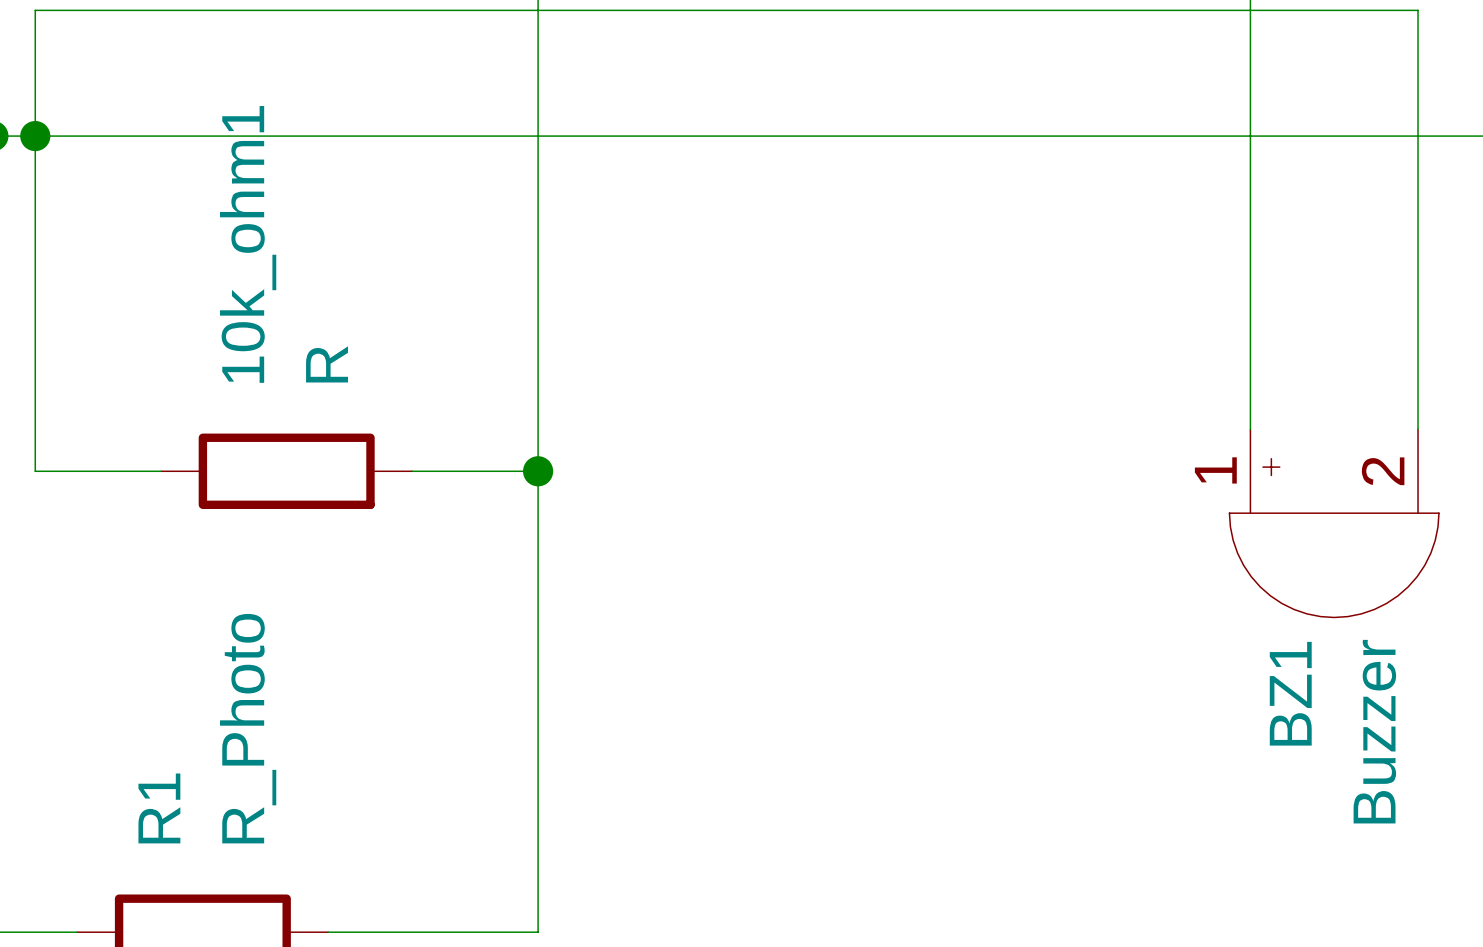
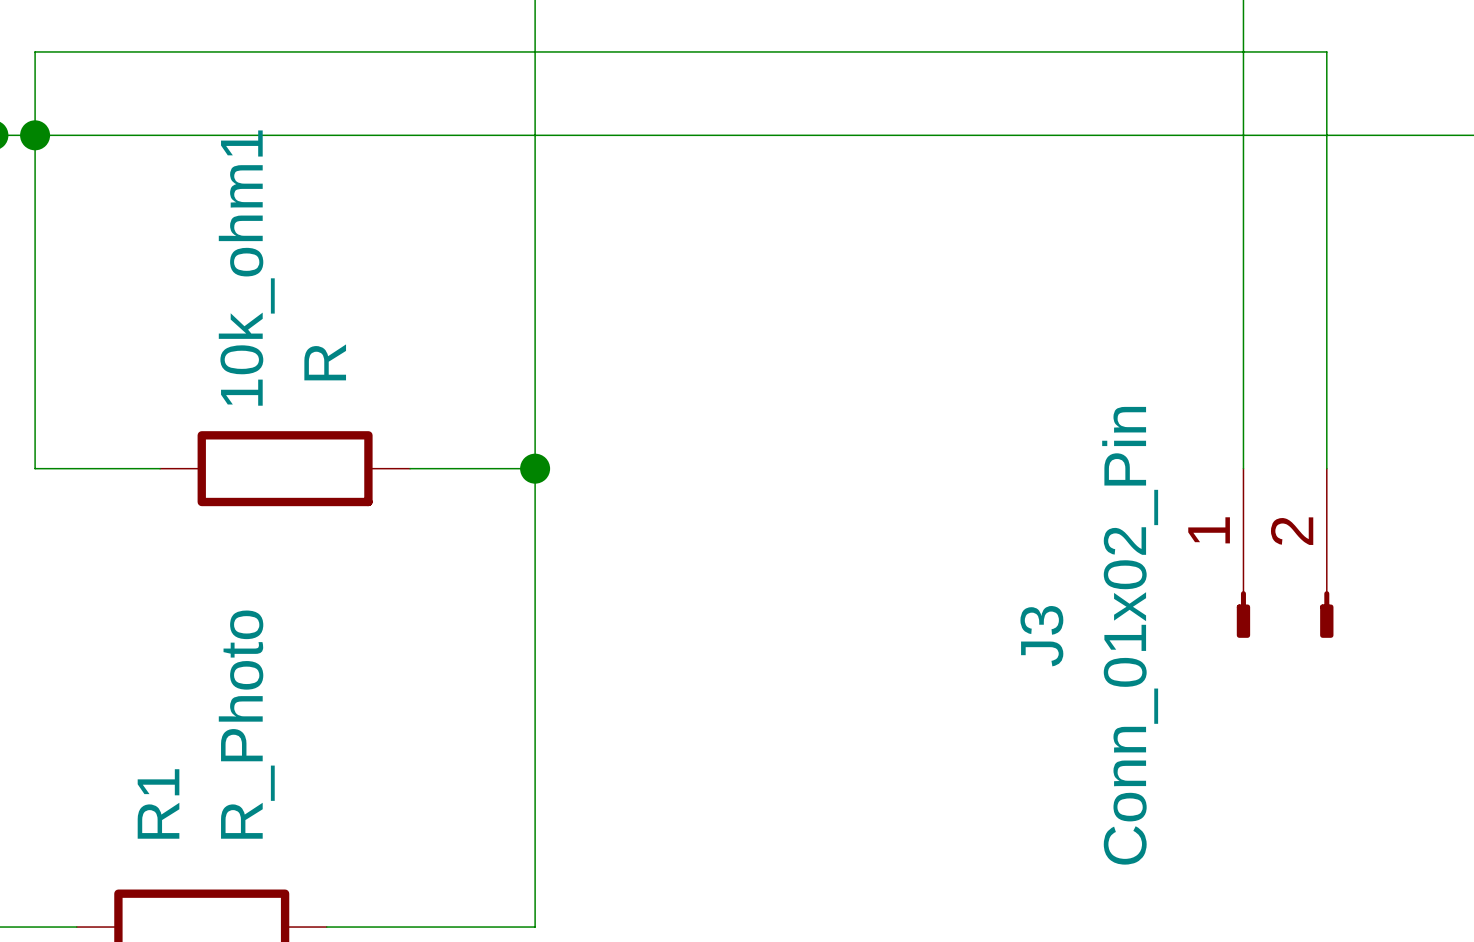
wire: (35, 52) (35, 10) (1418, 10) (1418, 429) -> (35, 51) (1326, 51) (1326, 468)
10k_ohm1 name position: 10k_ohm1 (248, 244) -> 10k_ohm1 (246, 268)
BZ1: Buzzer (1334, 523) -> none
J3: none -> Conn_01x02_Pin (1285, 553)

